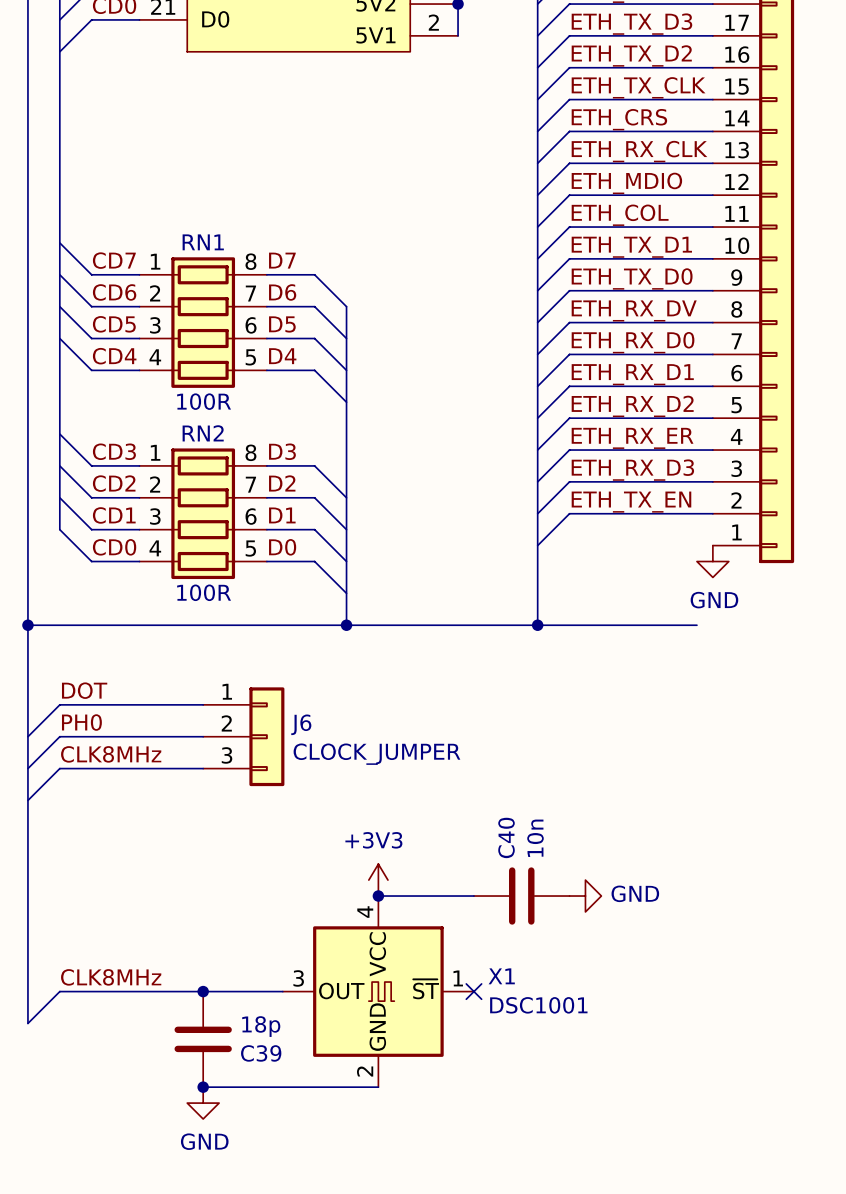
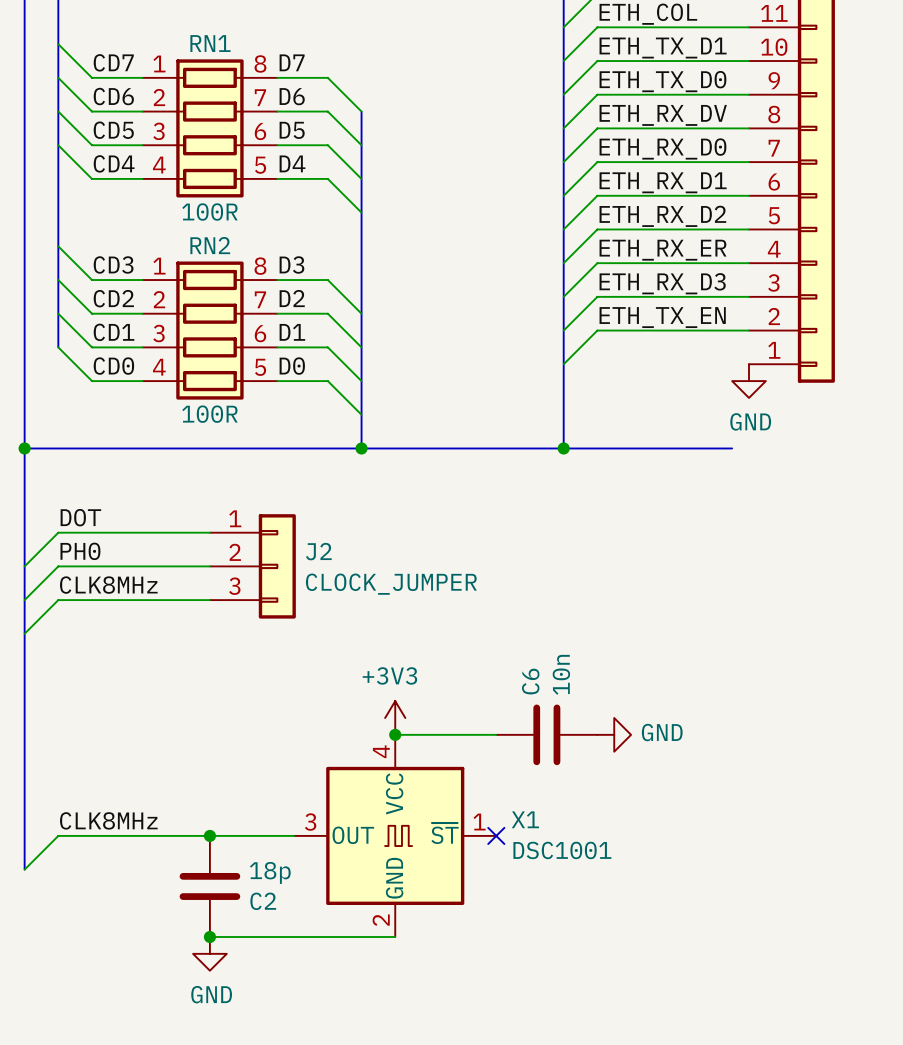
J6 name: J6 (301, 724) -> J2 (318, 551)
C40 name: C40 (506, 837) -> C6 (530, 681)
C39 name: C39 (261, 1053) -> C2 (263, 901)

